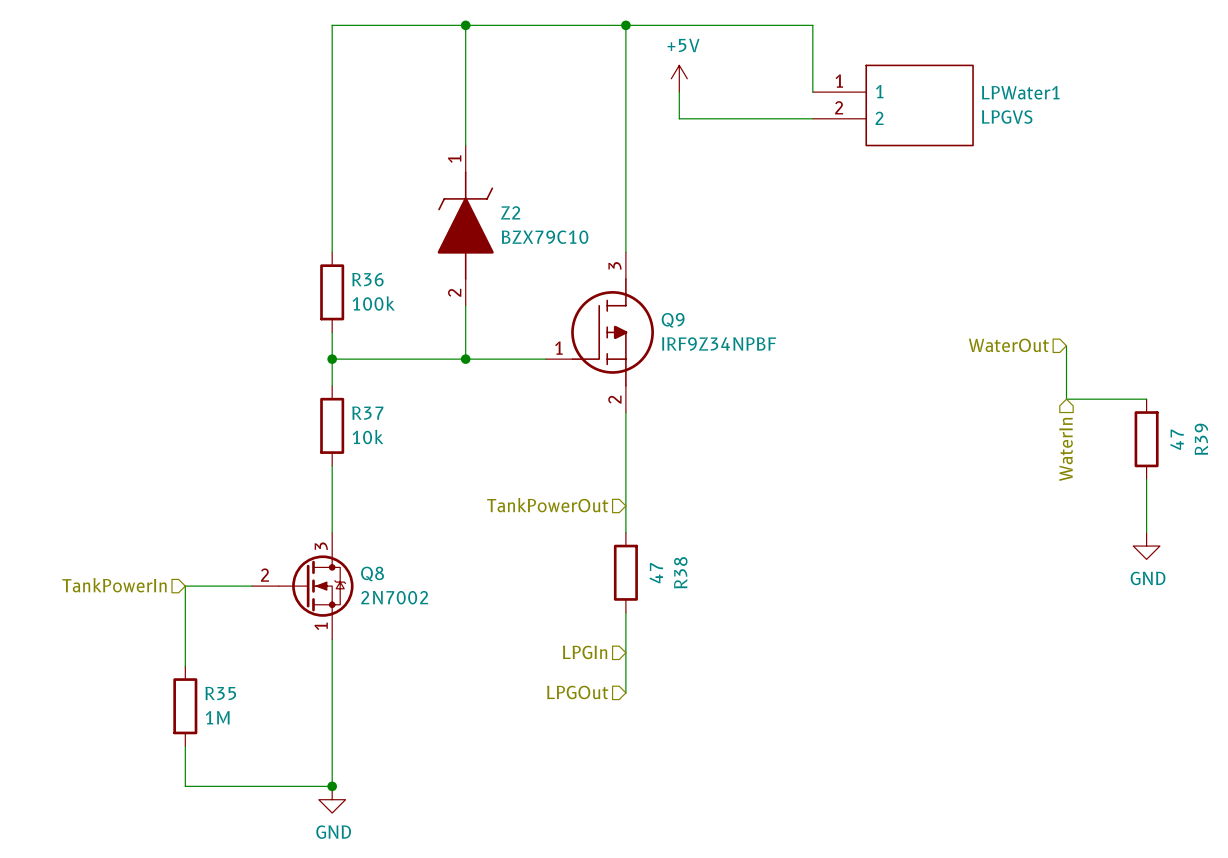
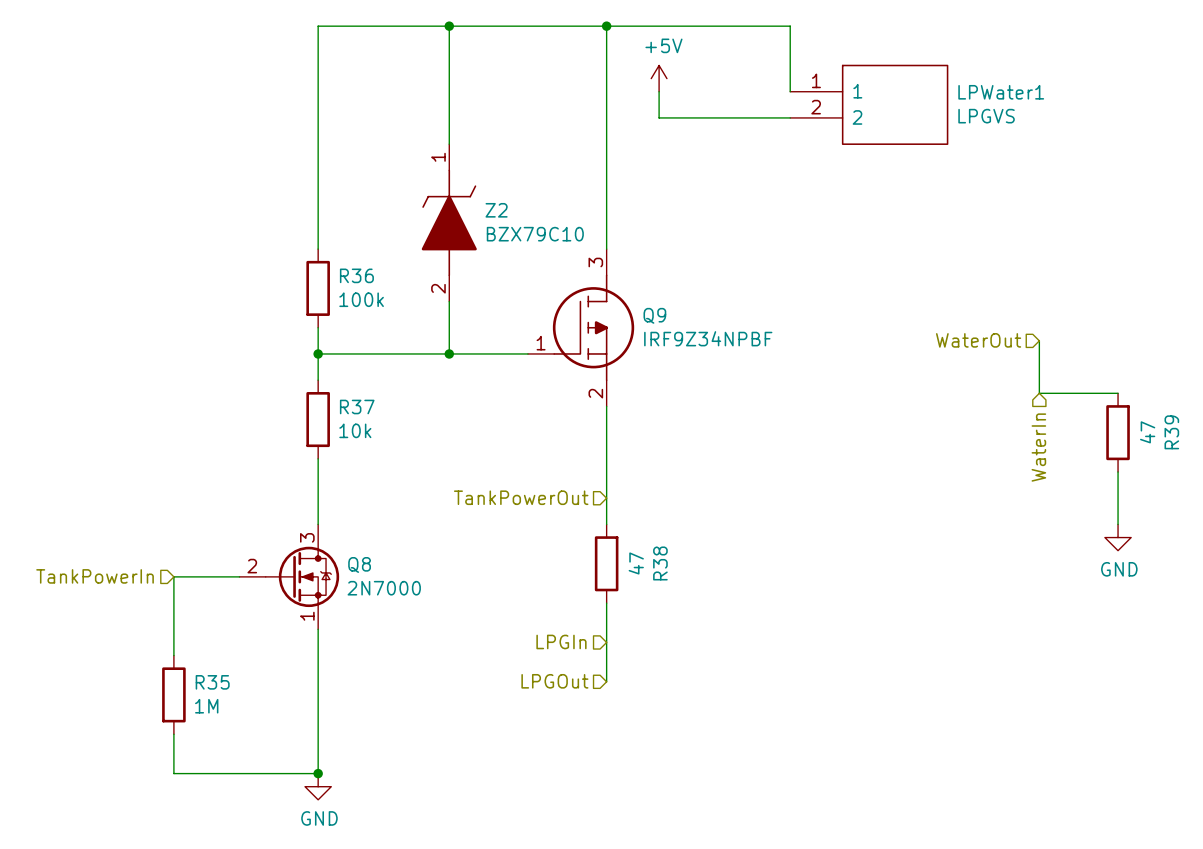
Q8 value: 2N7002 (394, 597) -> 2N7000 (384, 588)

